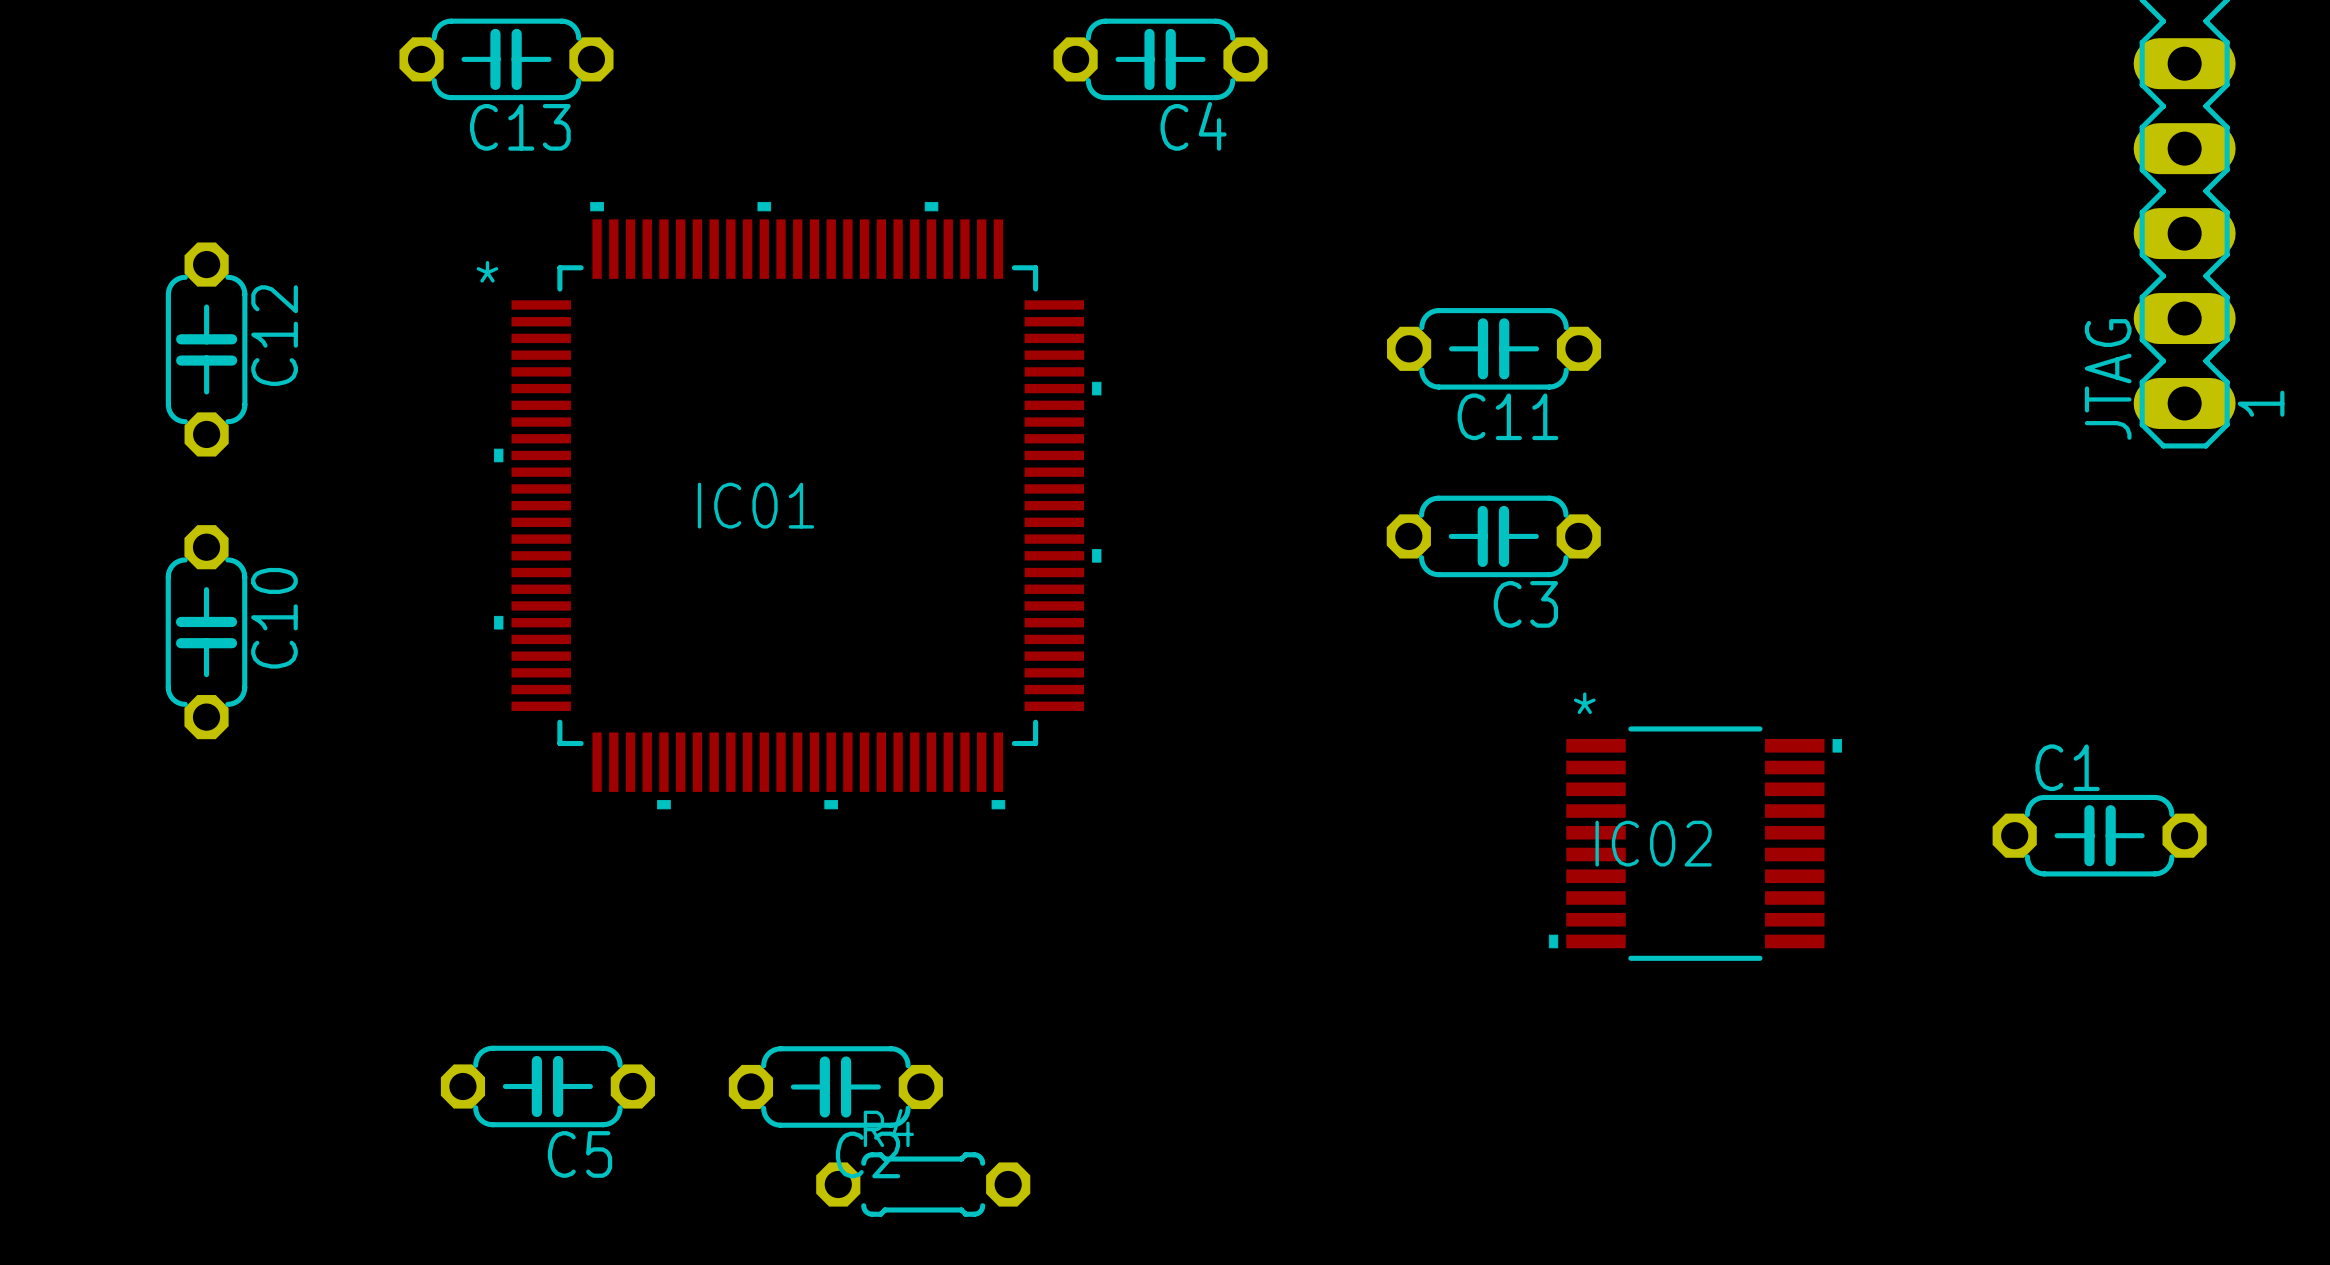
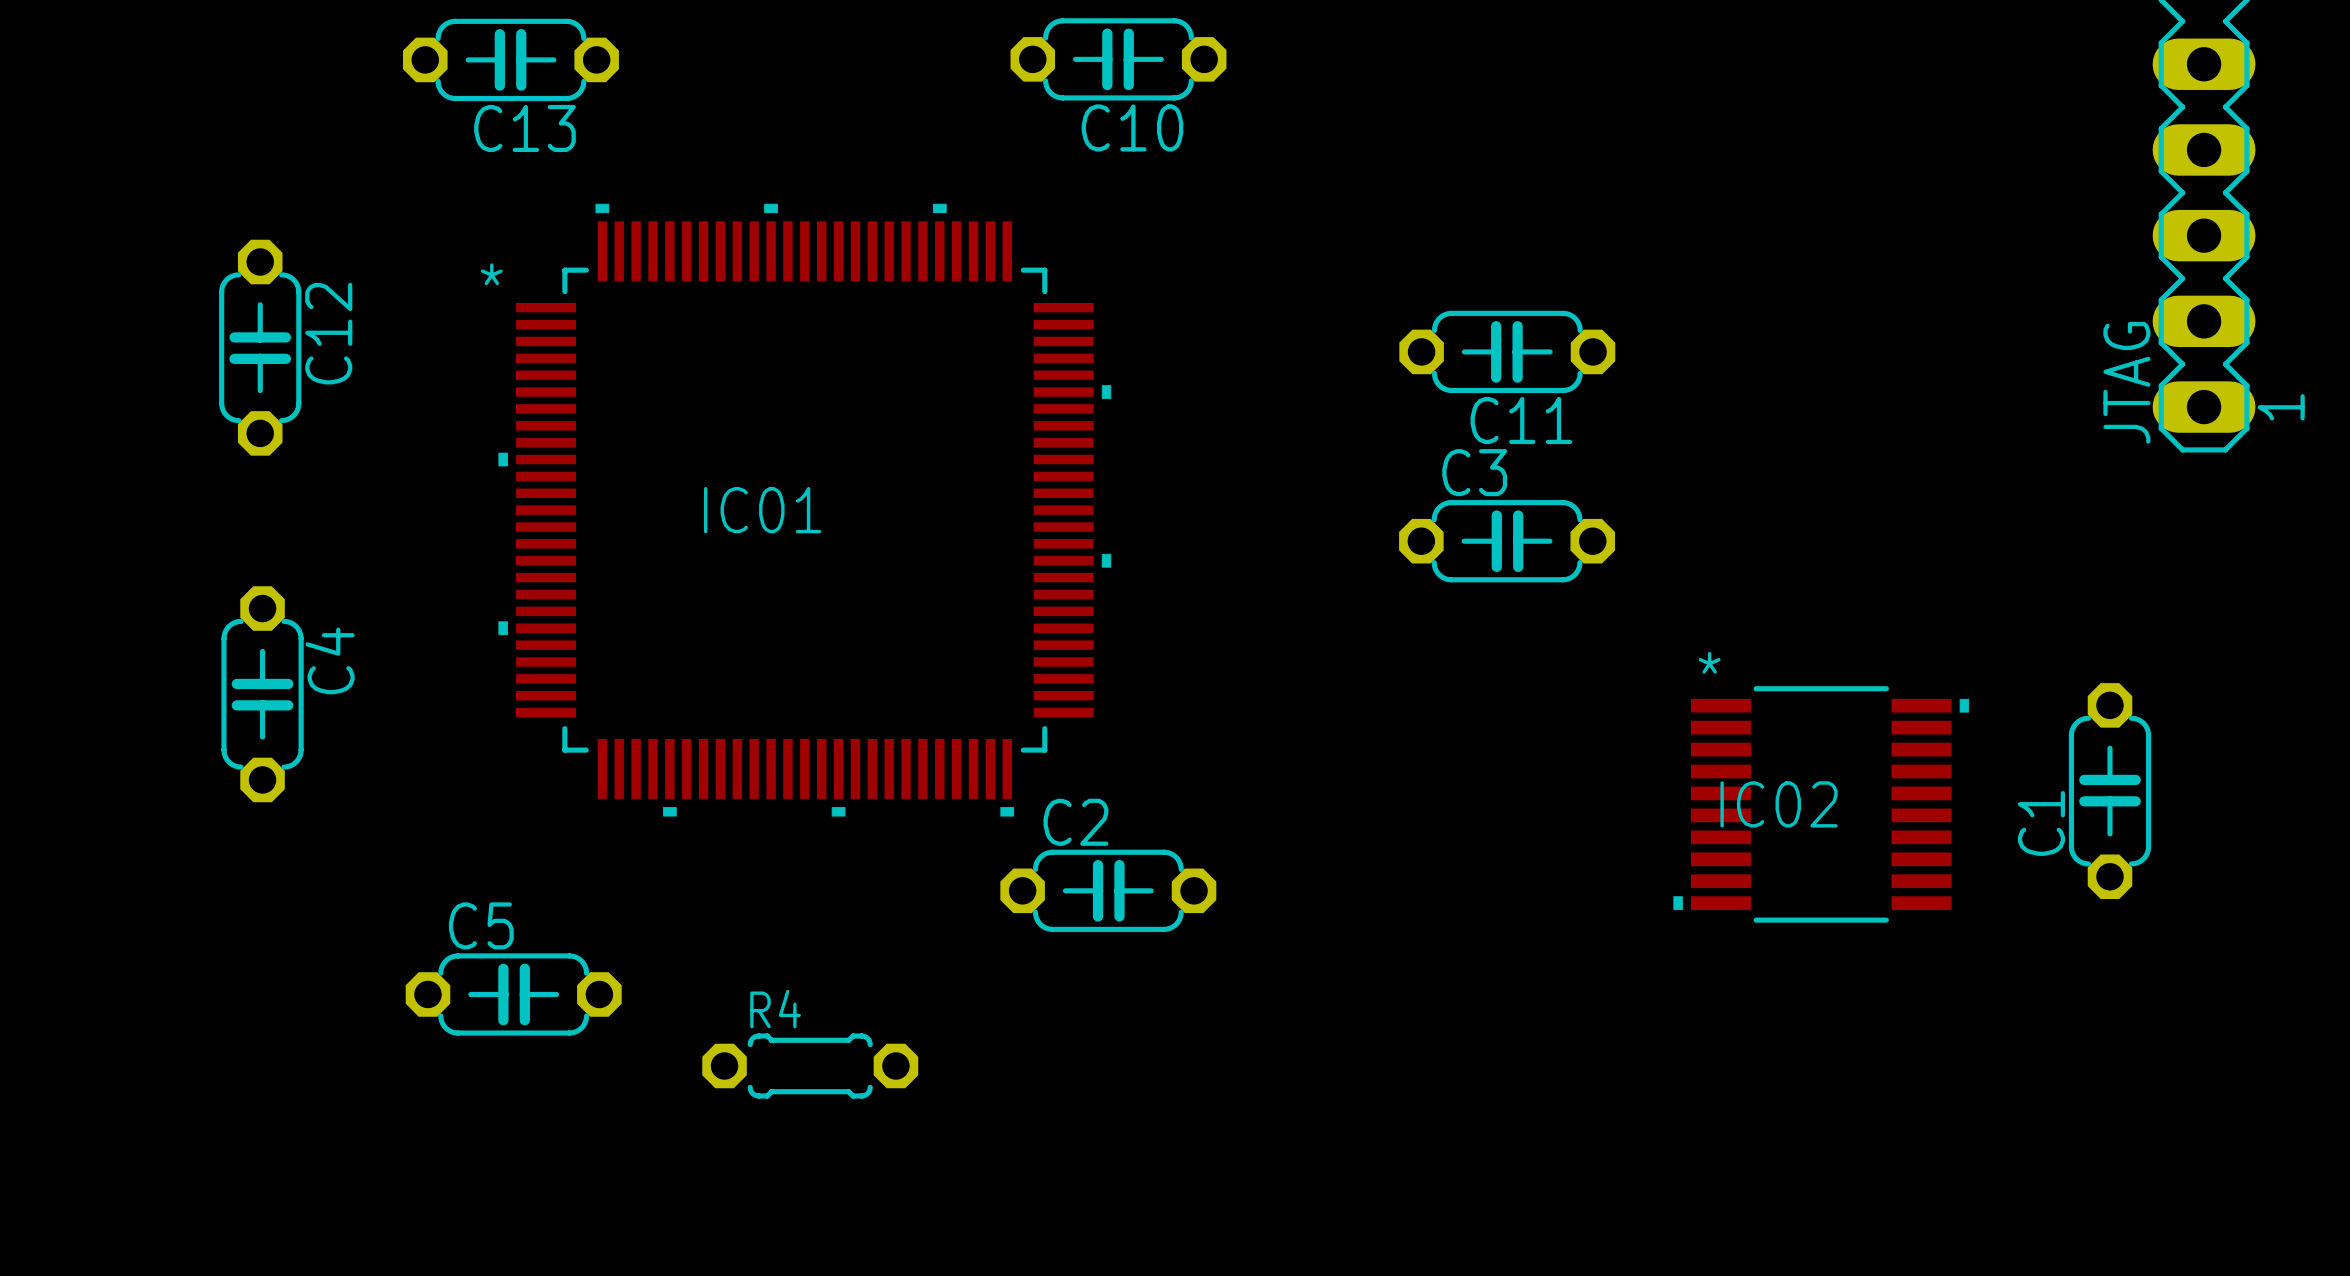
C4 rotation: 0° (1160, 59) -> 90° counterclockwise (262, 694)
C4 position: (1160, 59) -> (262, 694)
C12 position: (206, 349) -> (260, 347)
C3 rotation: 0° (1493, 536) -> 180° (1507, 541)
C10 rotation: 0° (206, 632) -> 90° clockwise (1118, 59)
C10 position: (206, 632) -> (1118, 59)
C1 rotation: 0° (2099, 835) -> 90° counterclockwise (2110, 791)
IC02 position: (1695, 843) -> (1821, 804)
C5 rotation: 0° (547, 1086) -> 180° (513, 994)
C2 rotation: 0° (835, 1086) -> 180° (1108, 890)
C2 position: (835, 1086) -> (1108, 890)
R4 position: (923, 1184) -> (810, 1065)

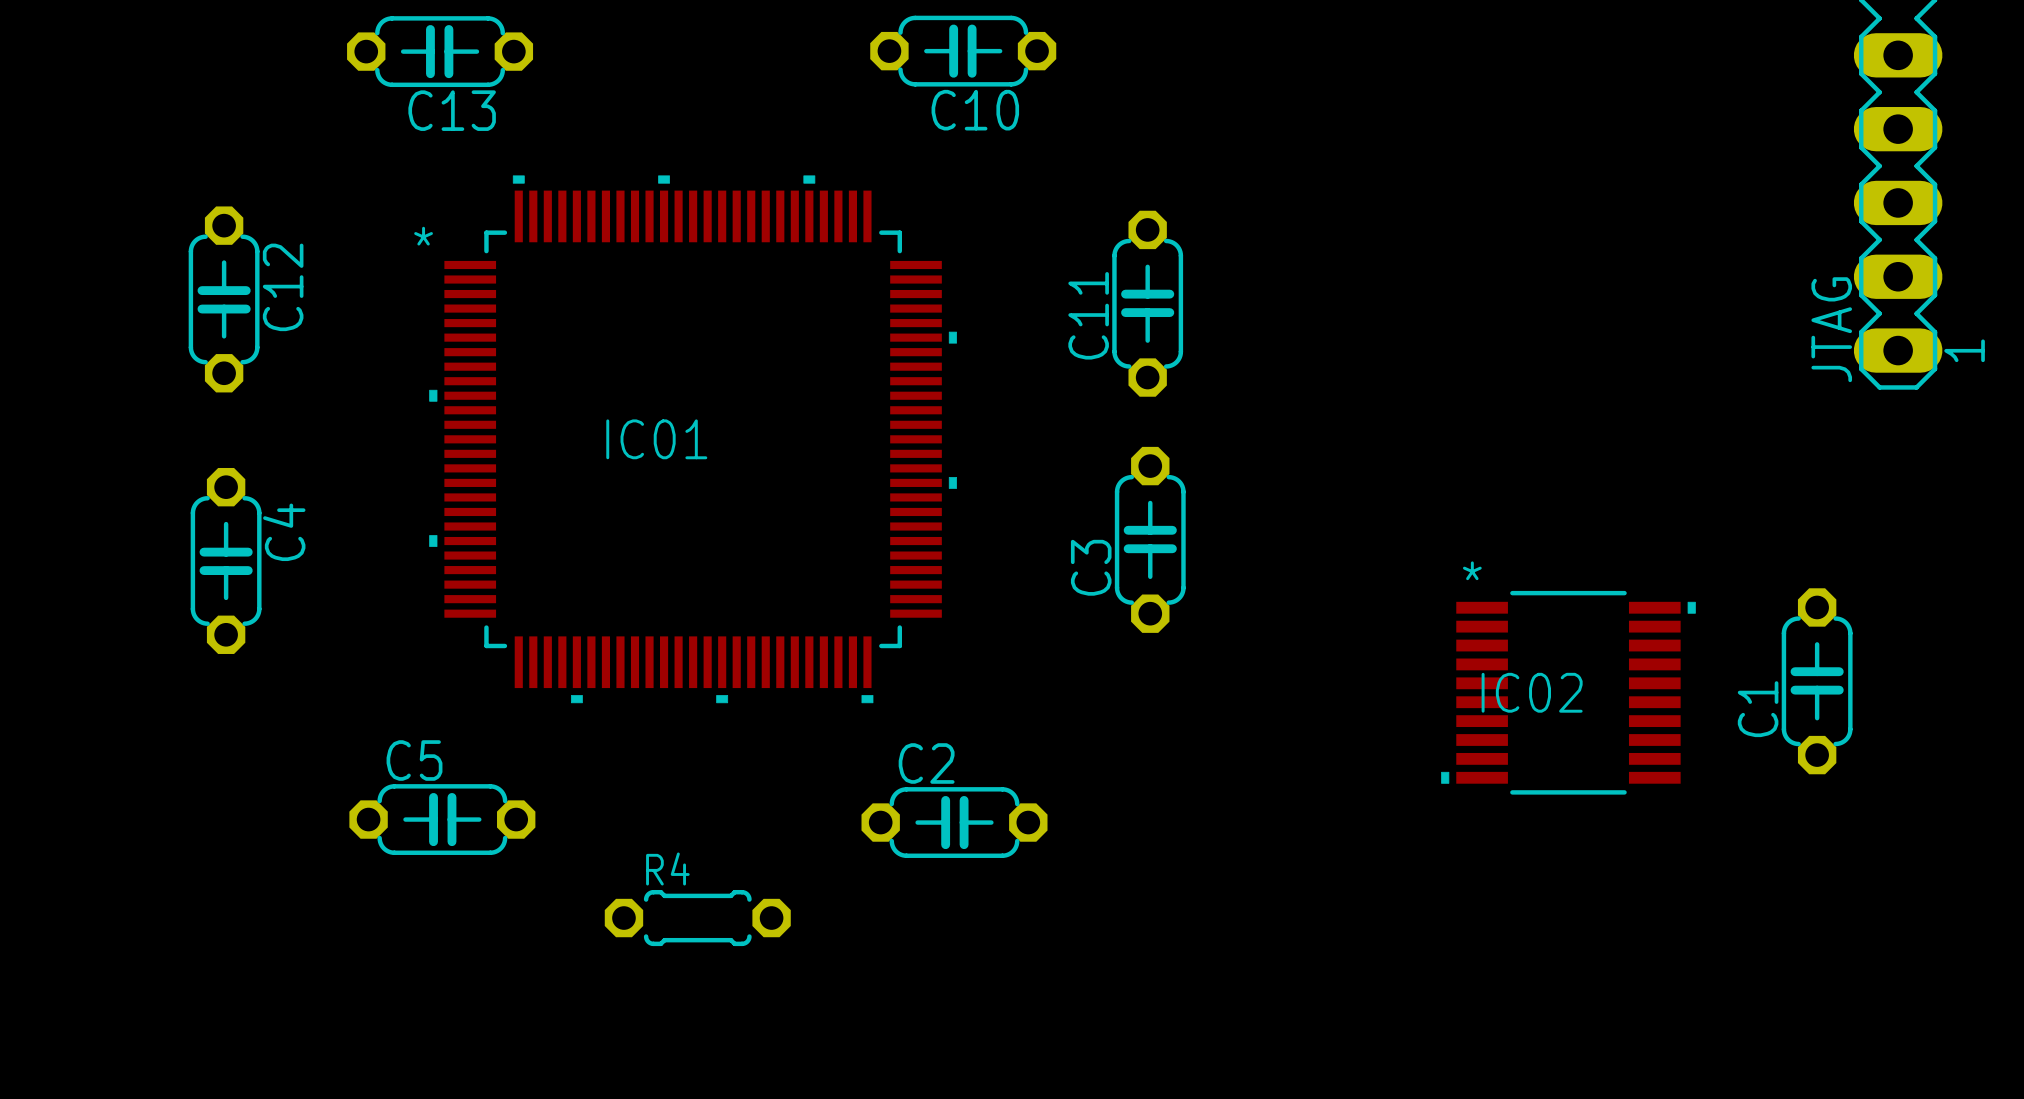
C11 rotation: 0° (1507, 351) -> 90° clockwise (1147, 303)
C11 position: (1507, 351) -> (1147, 303)
C3 rotation: 0° (1507, 541) -> 90° counterclockwise (1150, 539)
C3 position: (1507, 541) -> (1150, 539)
C4 position: (262, 694) -> (226, 560)
C2 position: (1108, 890) -> (954, 822)
C5 position: (513, 994) -> (442, 819)

